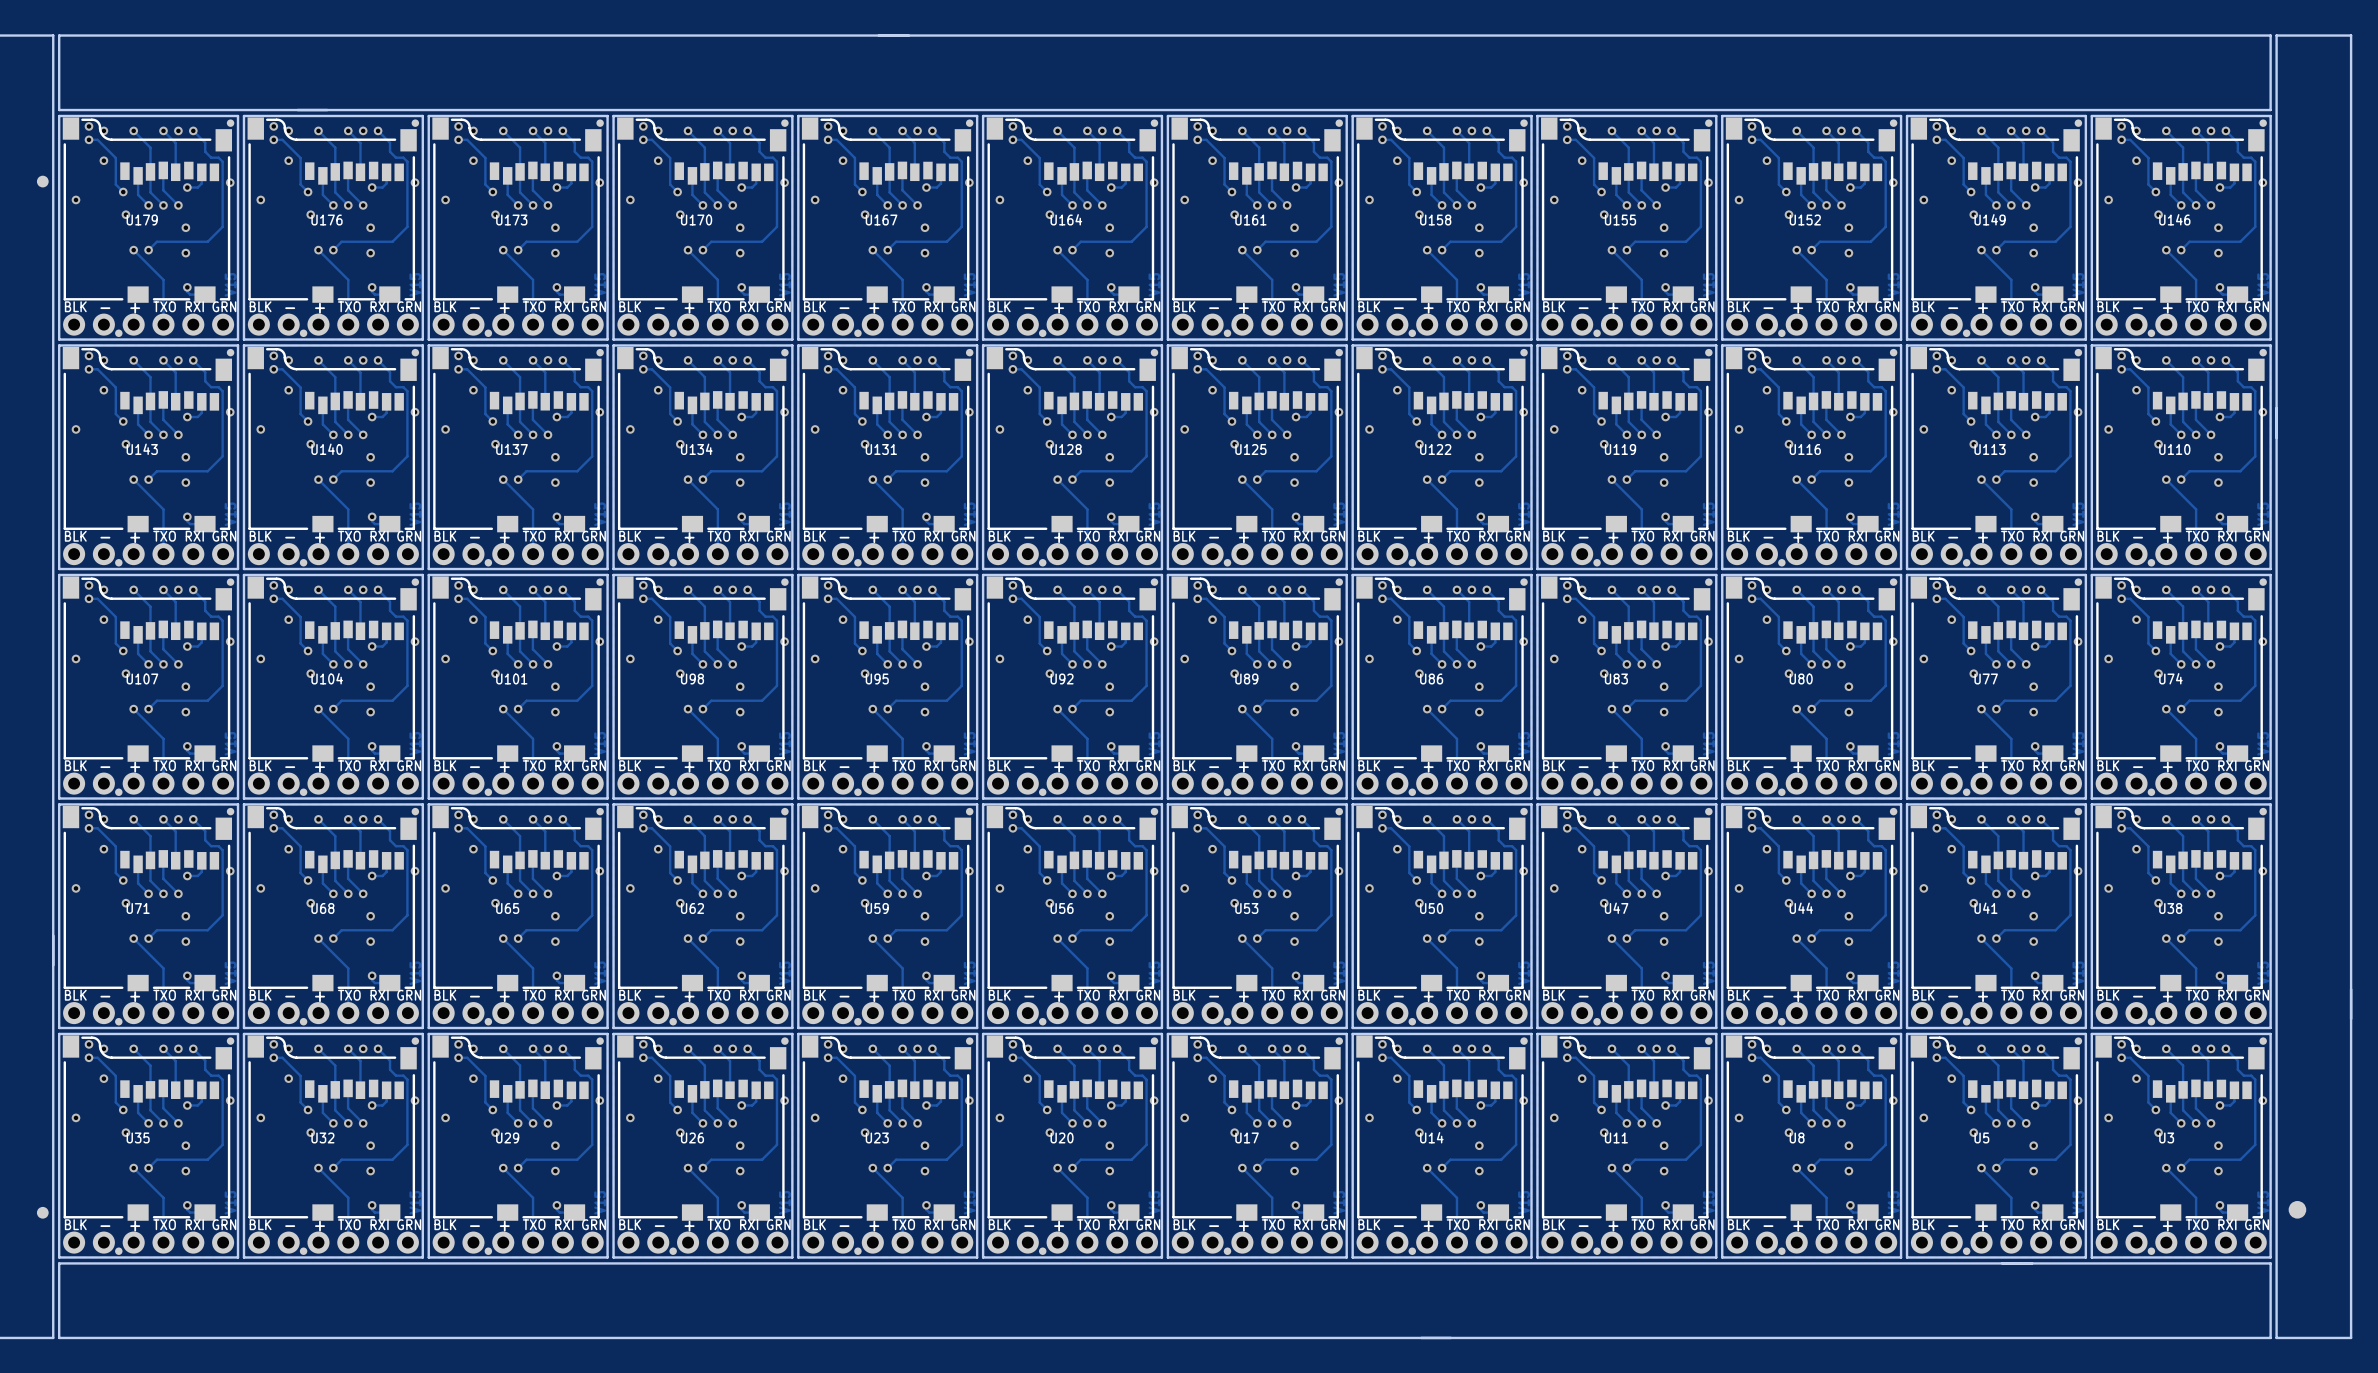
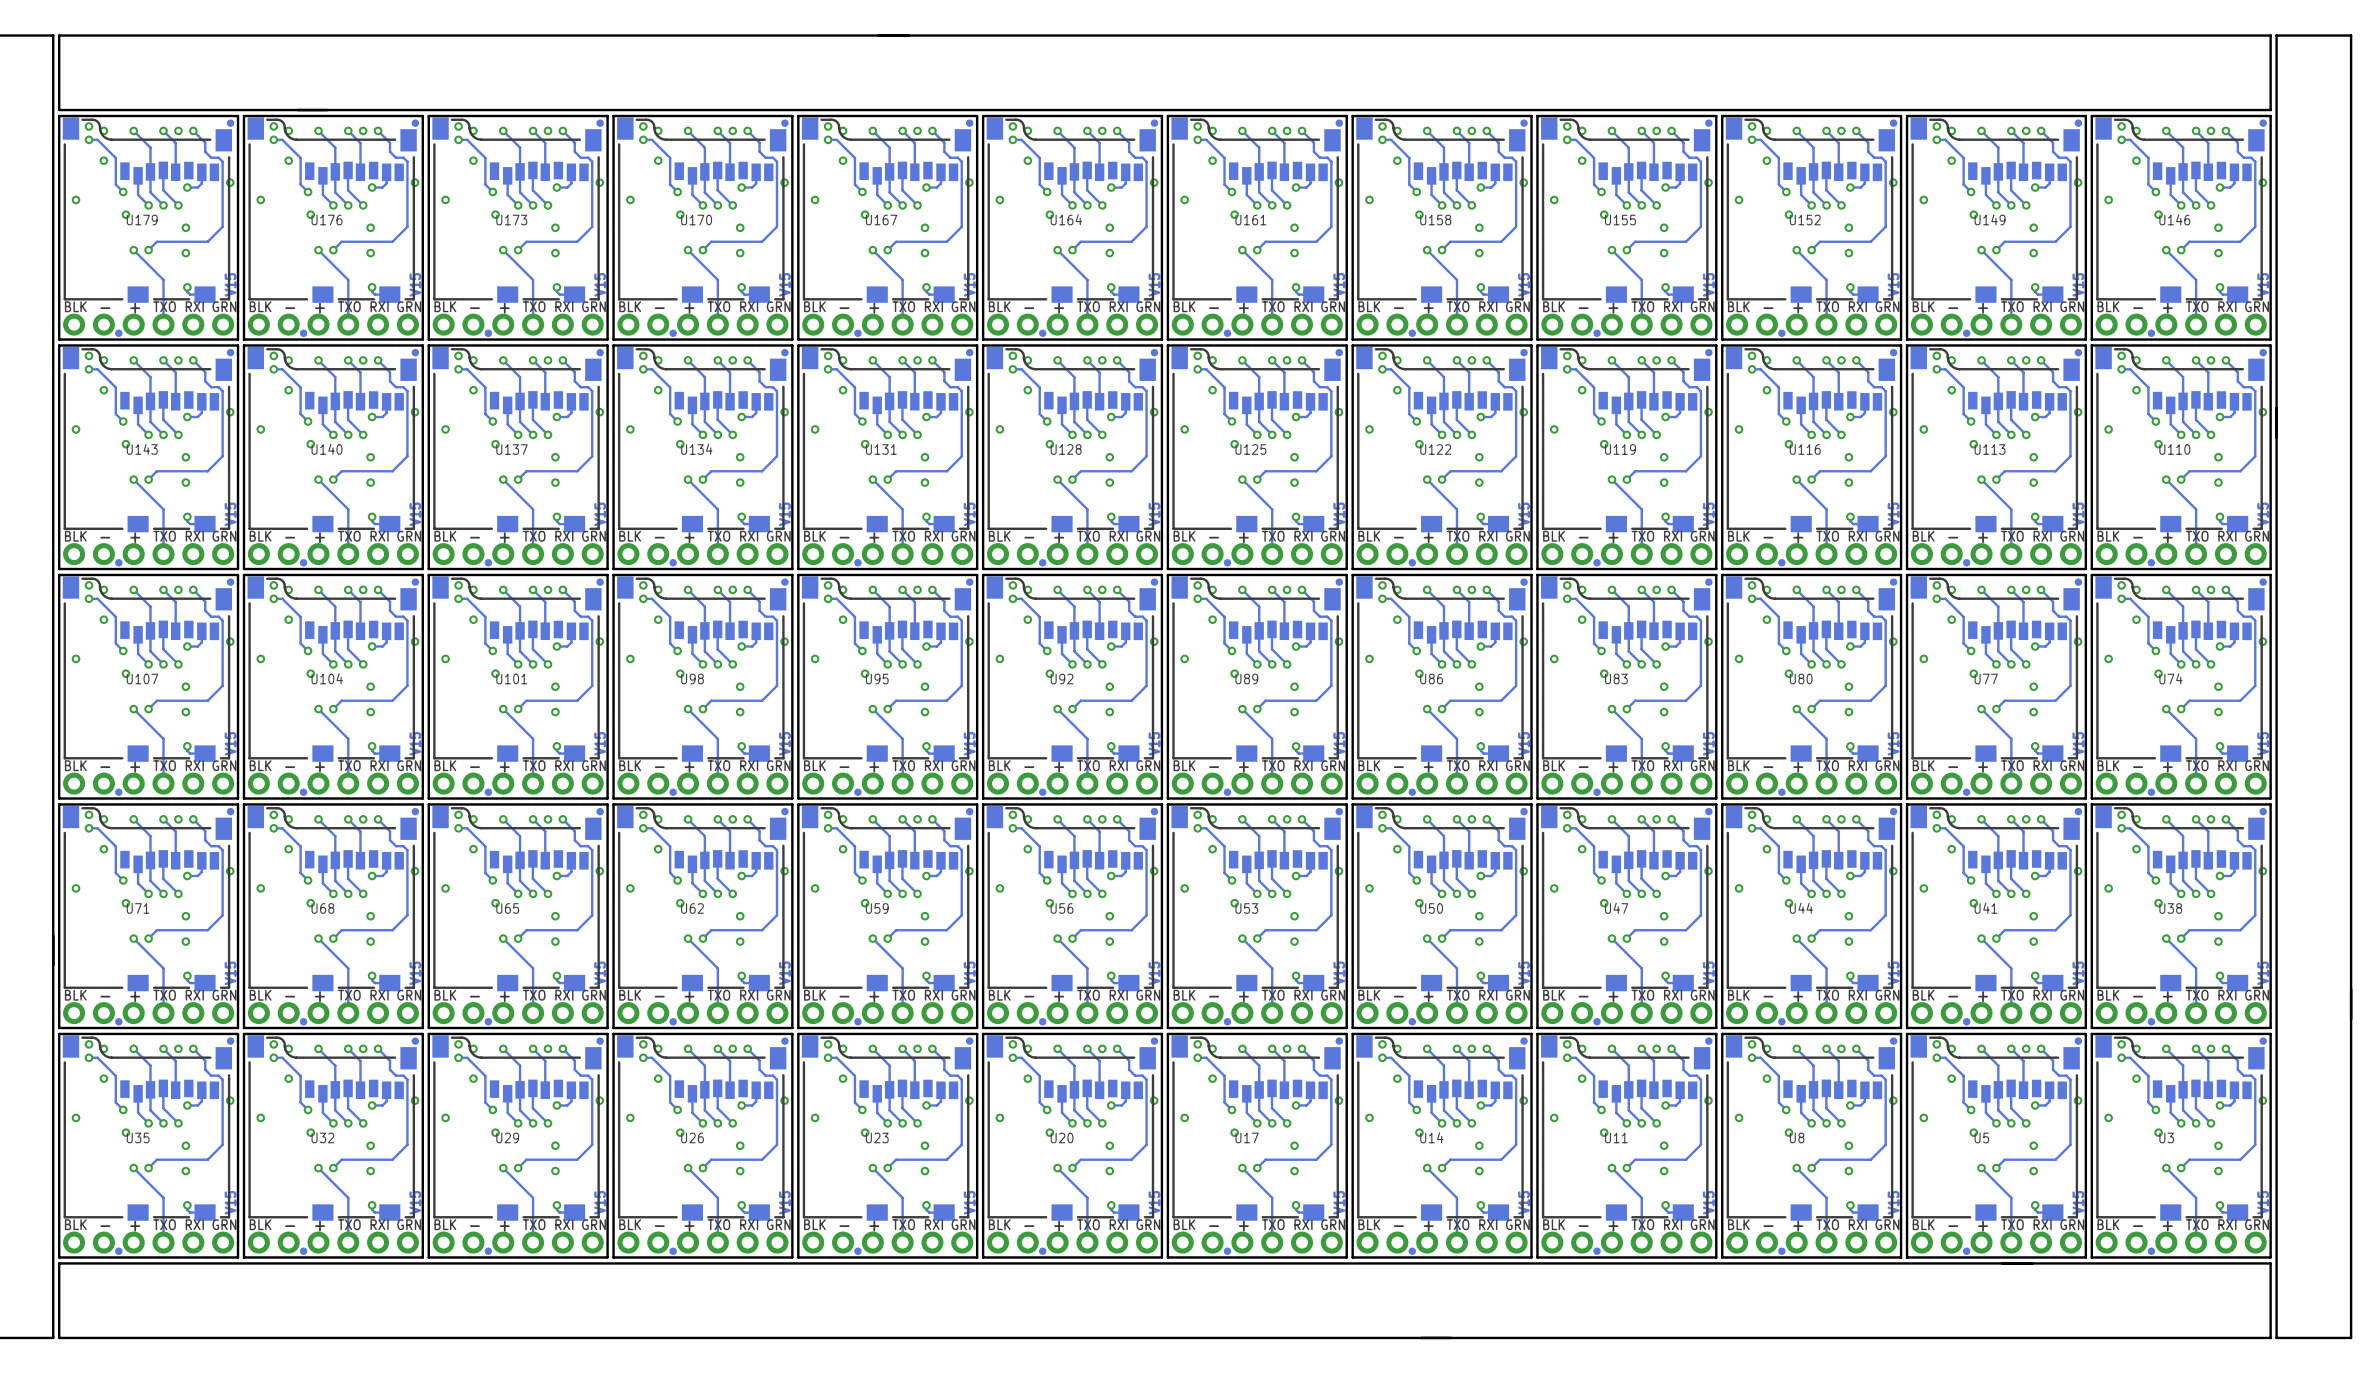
part: (42, 181) -> none
part: (2297, 1209) -> none
part: (42, 1212) -> none

